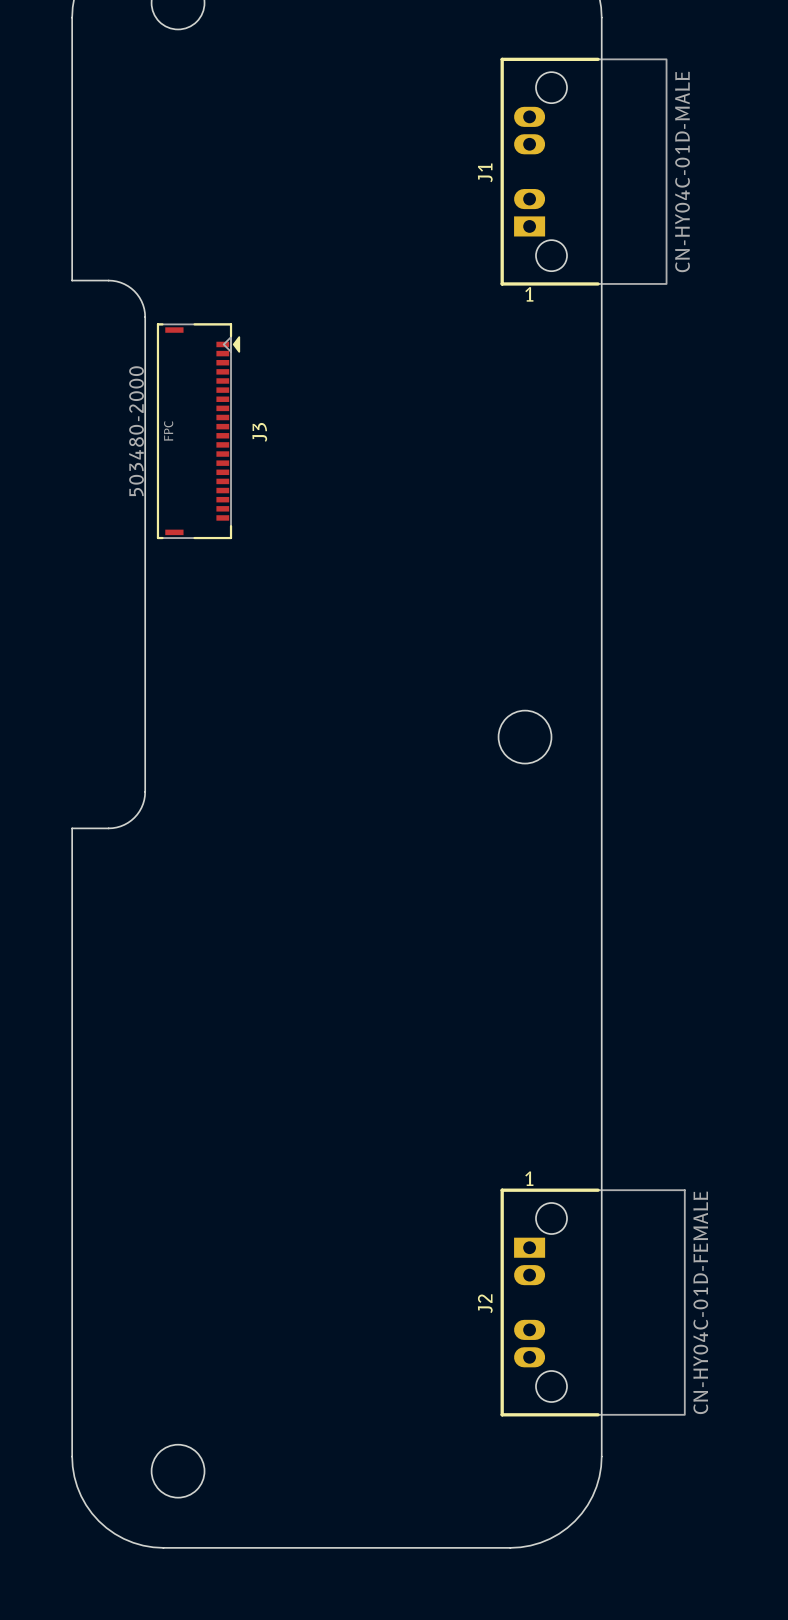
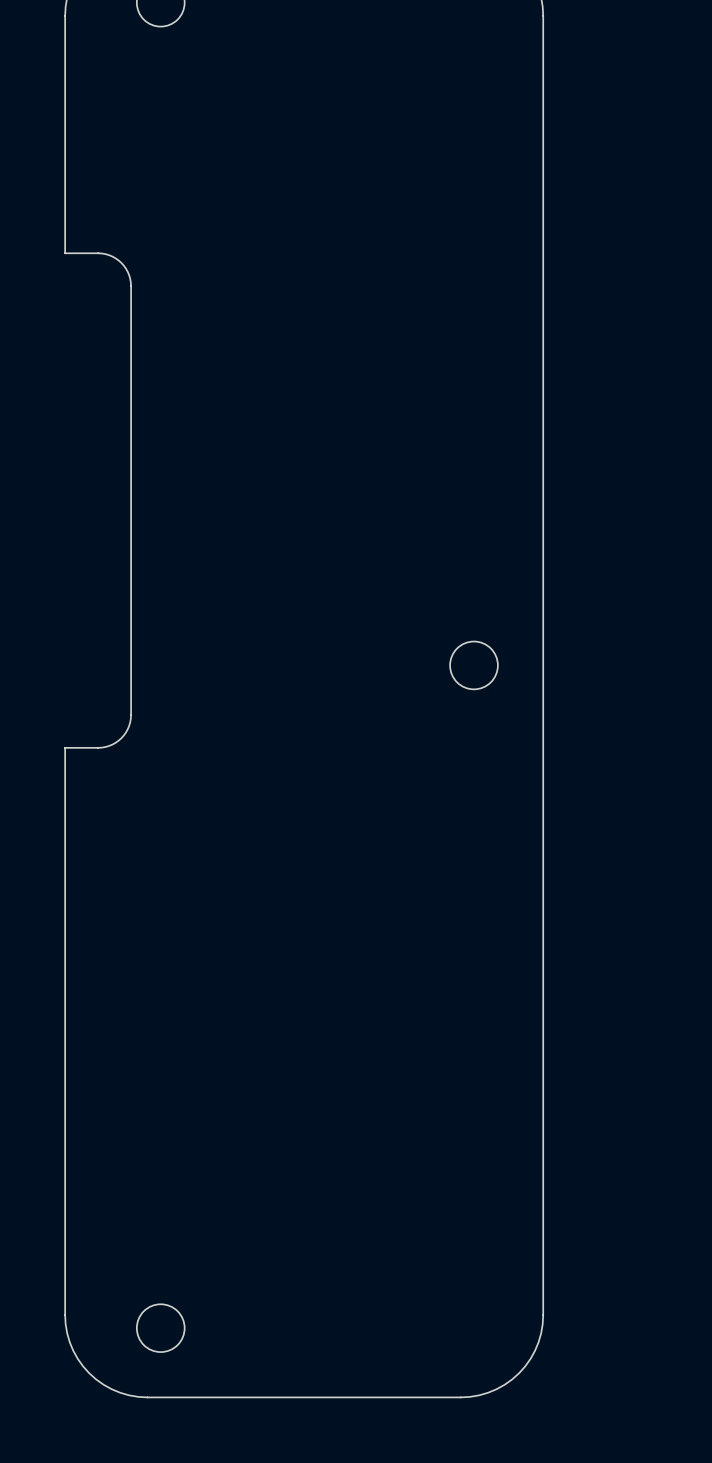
J1: CN-HY04C-01D-MALE (584, 171) -> none
J3: 503480-2000 (198, 431) -> none
J2: CN-HY04C-01D-FEMALE (593, 1302) -> none

